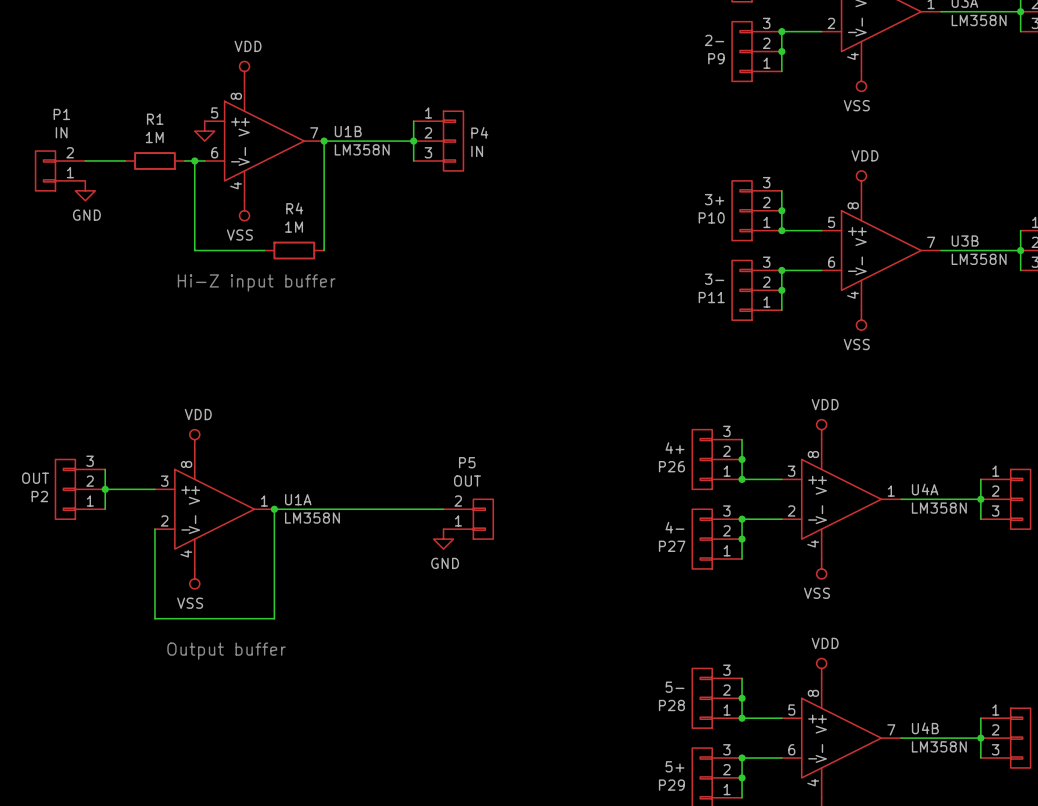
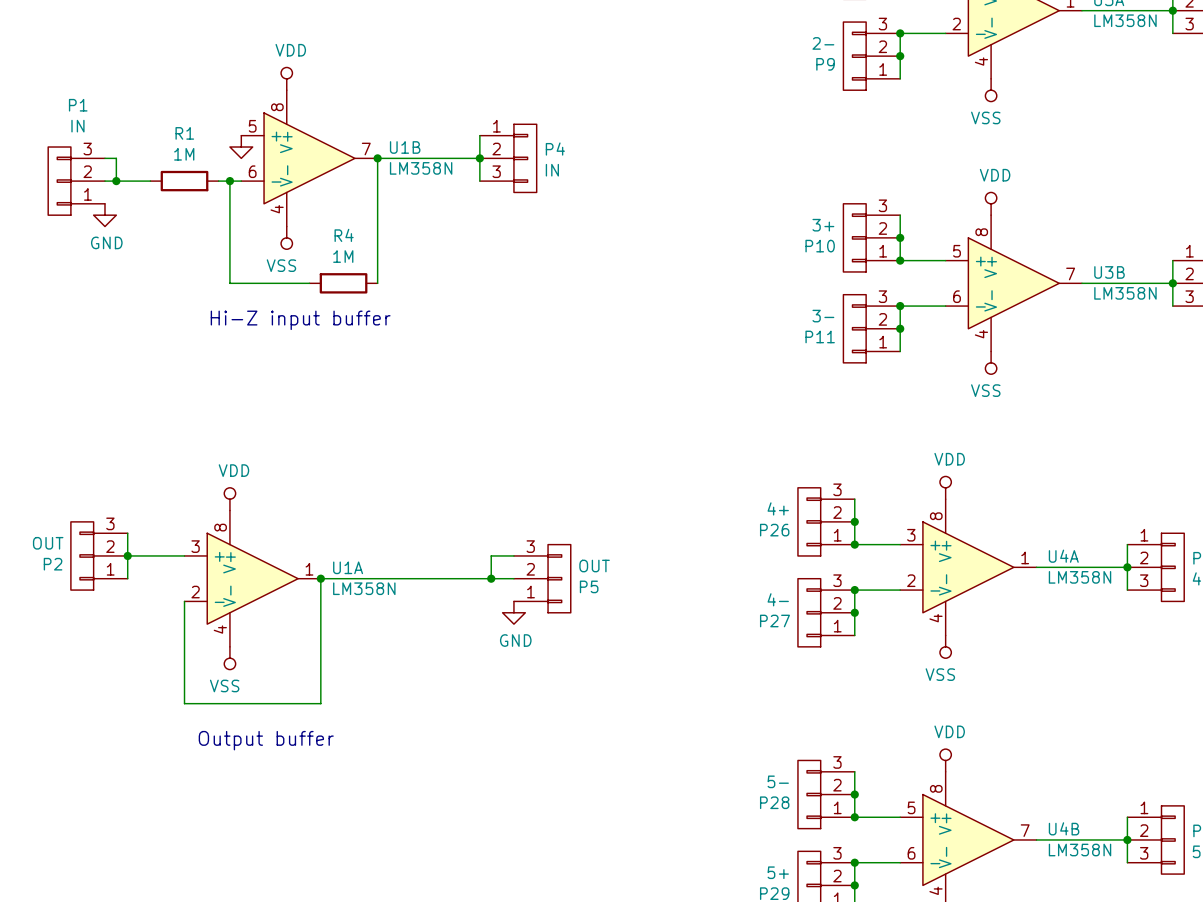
wire: none -> (104, 158) (116, 158) (116, 181)
P1 symbol: [35, 151, 86, 191] -> [48, 147, 105, 216]
junction: none -> (116, 181)
P5 name position: P5 (467, 462) -> P5 (589, 586)
P5 value position: OUT (467, 481) -> OUT (594, 566)
wire: none -> (513, 555) (491, 555) (491, 578)
P5 symbol: [443, 499, 494, 540] -> [513, 544, 571, 613]
junction: none -> (491, 578)

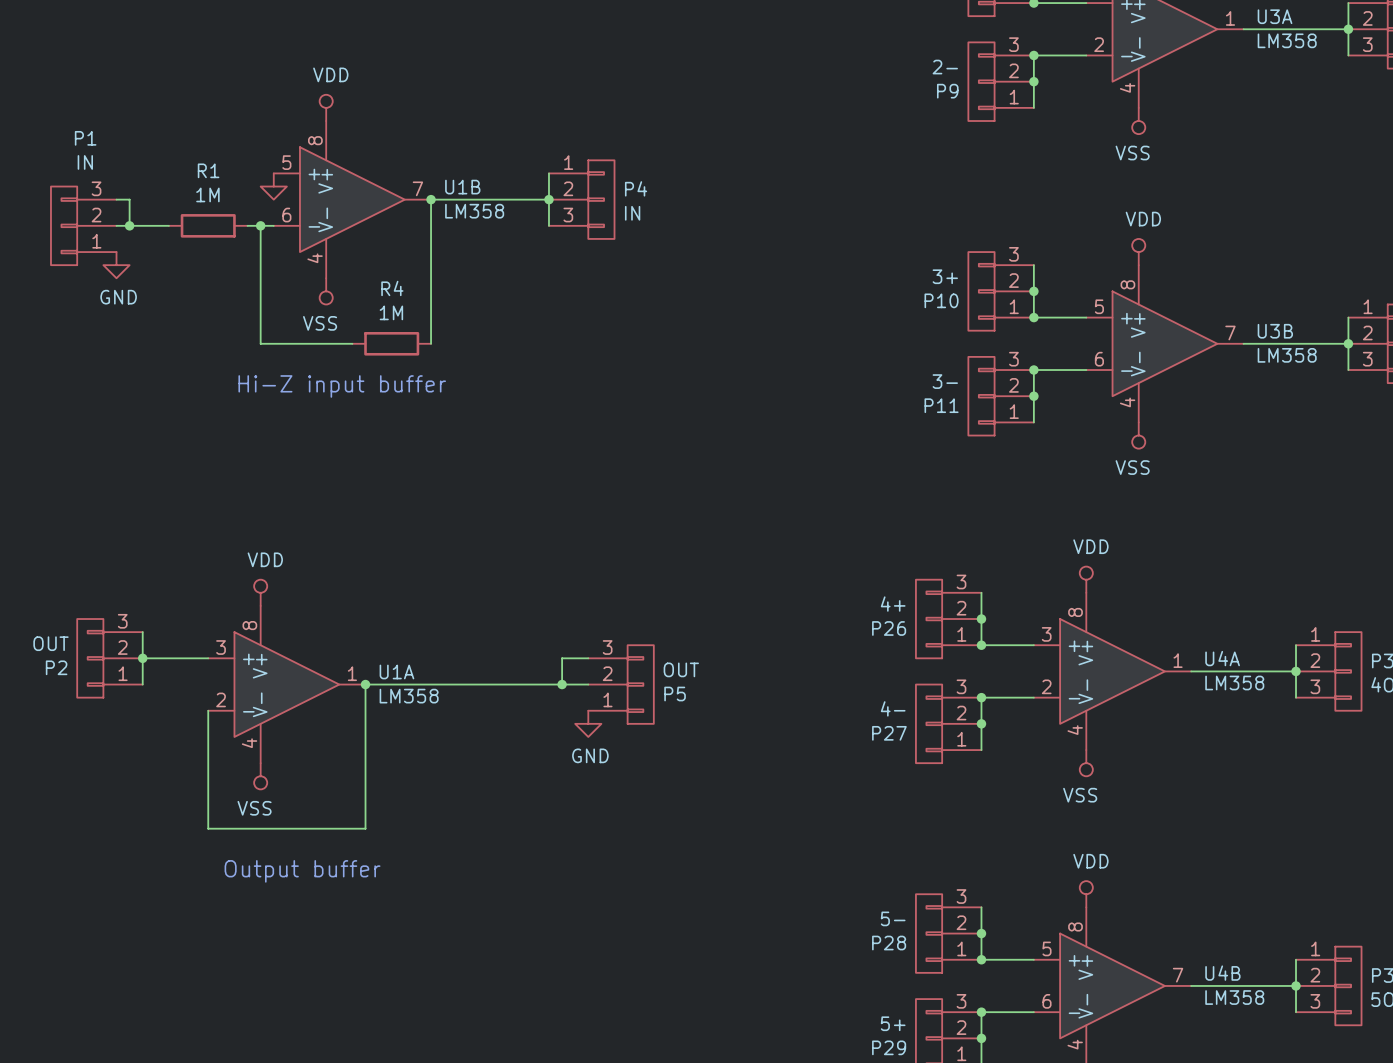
U3A value: LM358N (1125, 20) -> LM358 (1287, 40)
U1B value: LM358N (421, 168) -> LM358 (474, 211)
U3B value: LM358N (1125, 293) -> LM358 (1287, 355)
U4A value: LM358N (1080, 577) -> LM358 (1234, 683)
U1A value: LM358N (364, 588) -> LM358 (409, 696)
U4B value: LM358N (1080, 850) -> LM358 (1234, 997)

